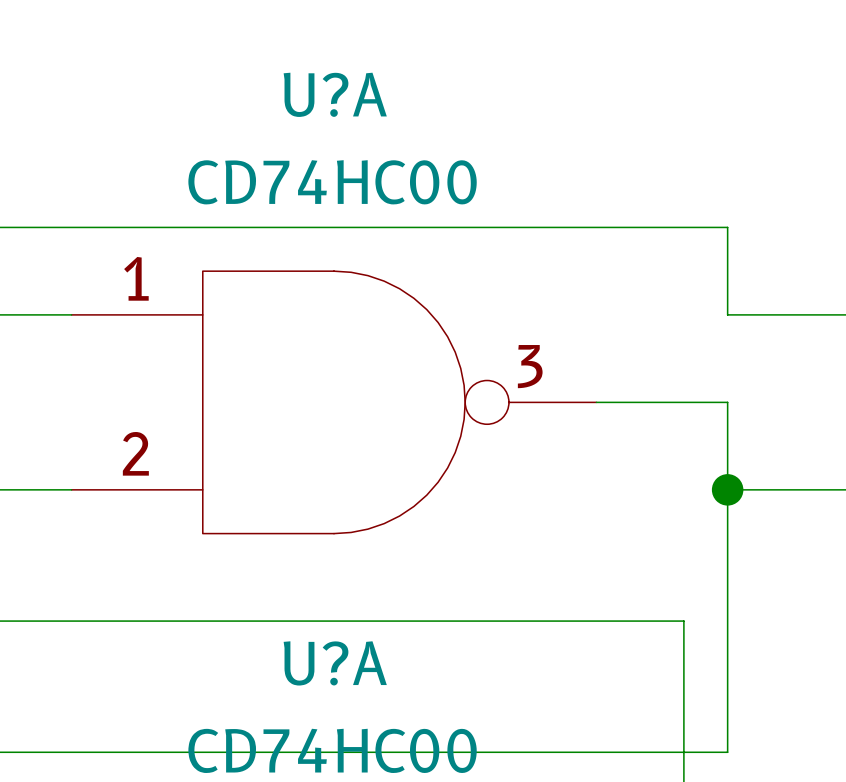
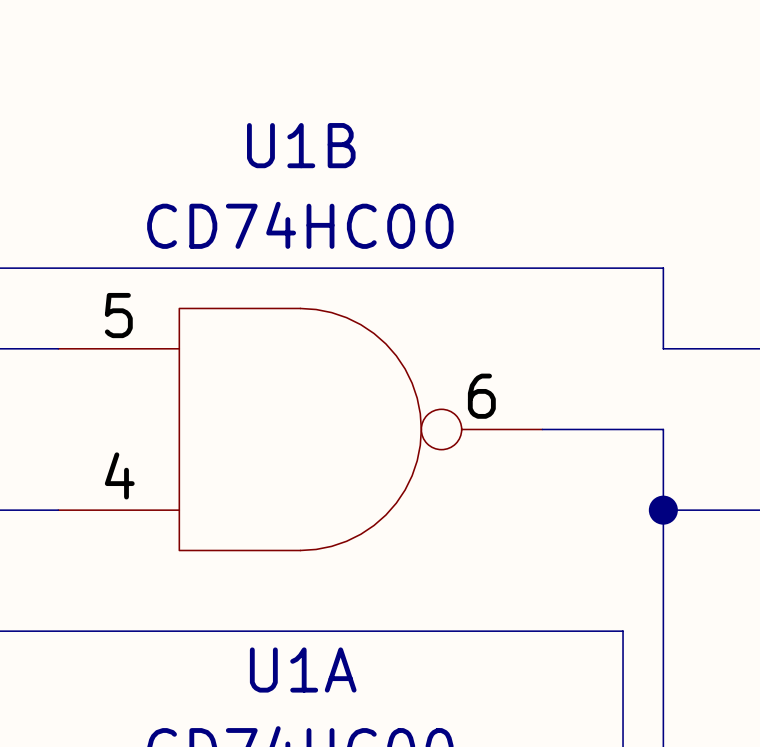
U?A name: U?A (335, 94) -> U1B (301, 145)
U?A pin number: 1 (136, 278) -> 5 (118, 315)
U?A pin number: 3 (530, 366) -> 6 (481, 396)
U?A pin number: 2 (135, 453) -> 4 (119, 475)
U?A name: U?A (335, 663) -> U1A (303, 669)

